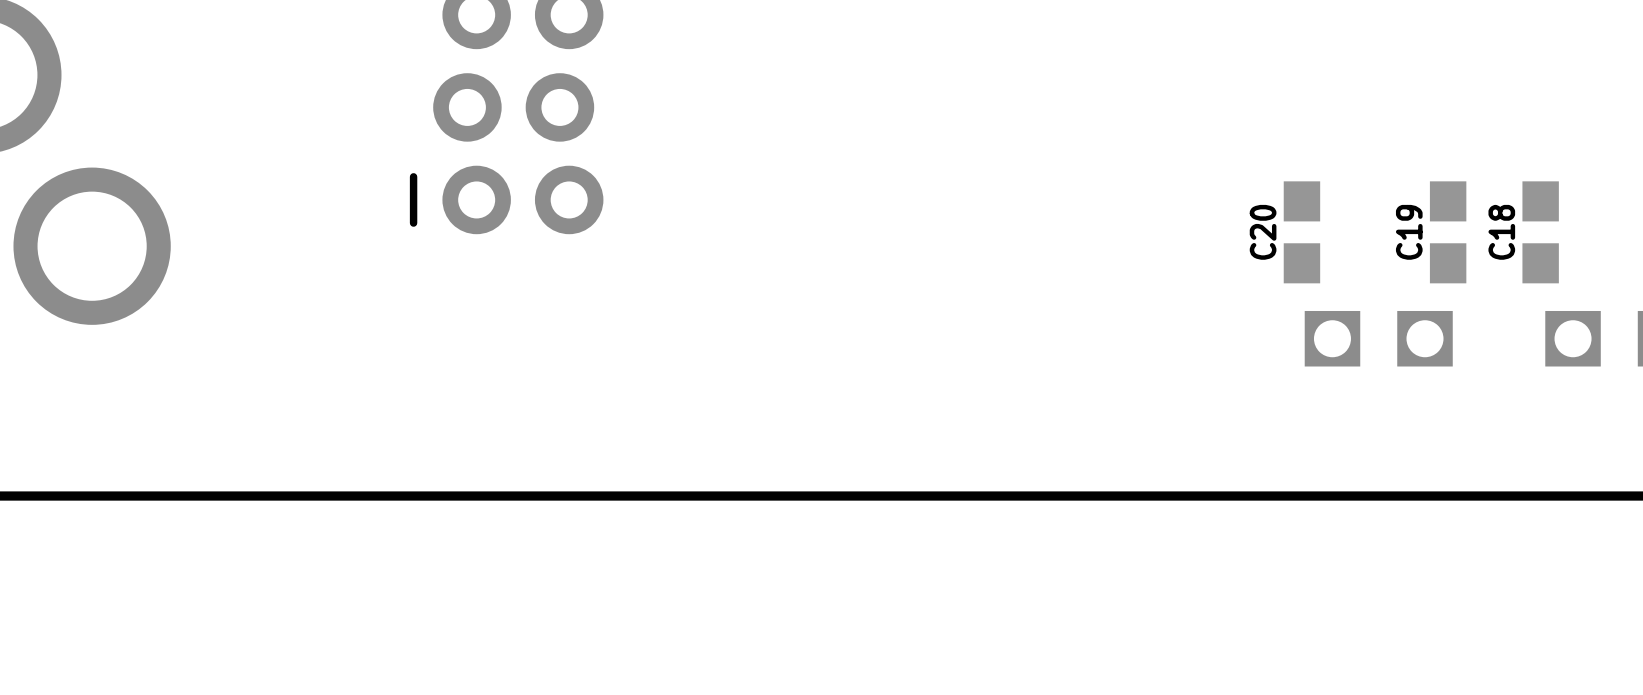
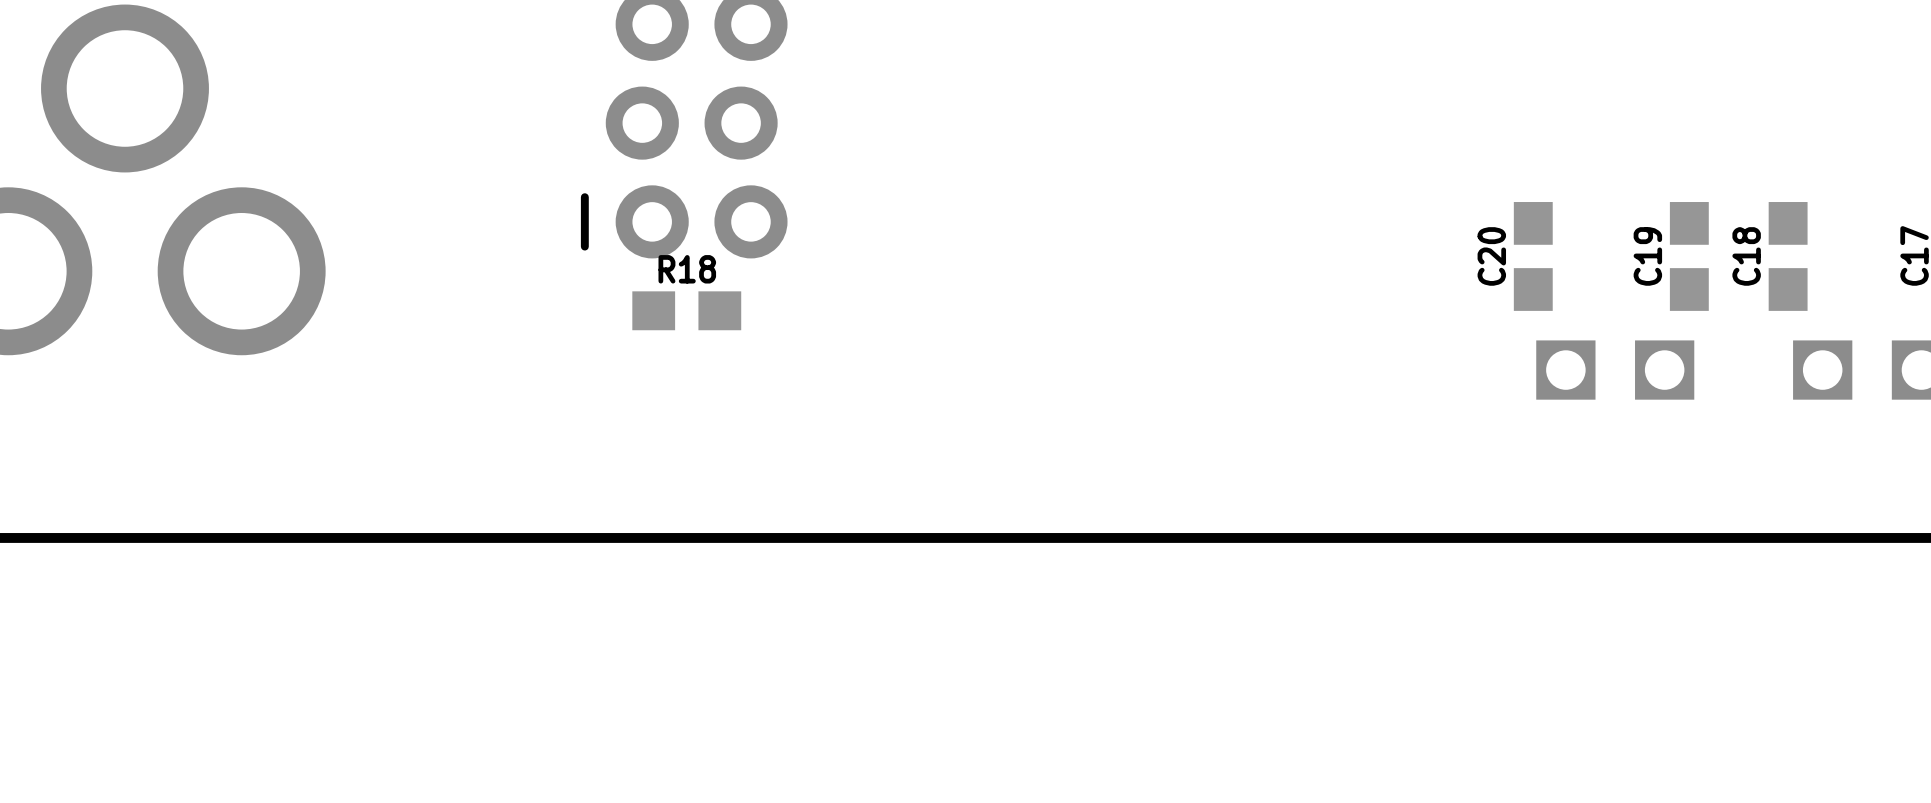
R18: none -> (686, 310)

